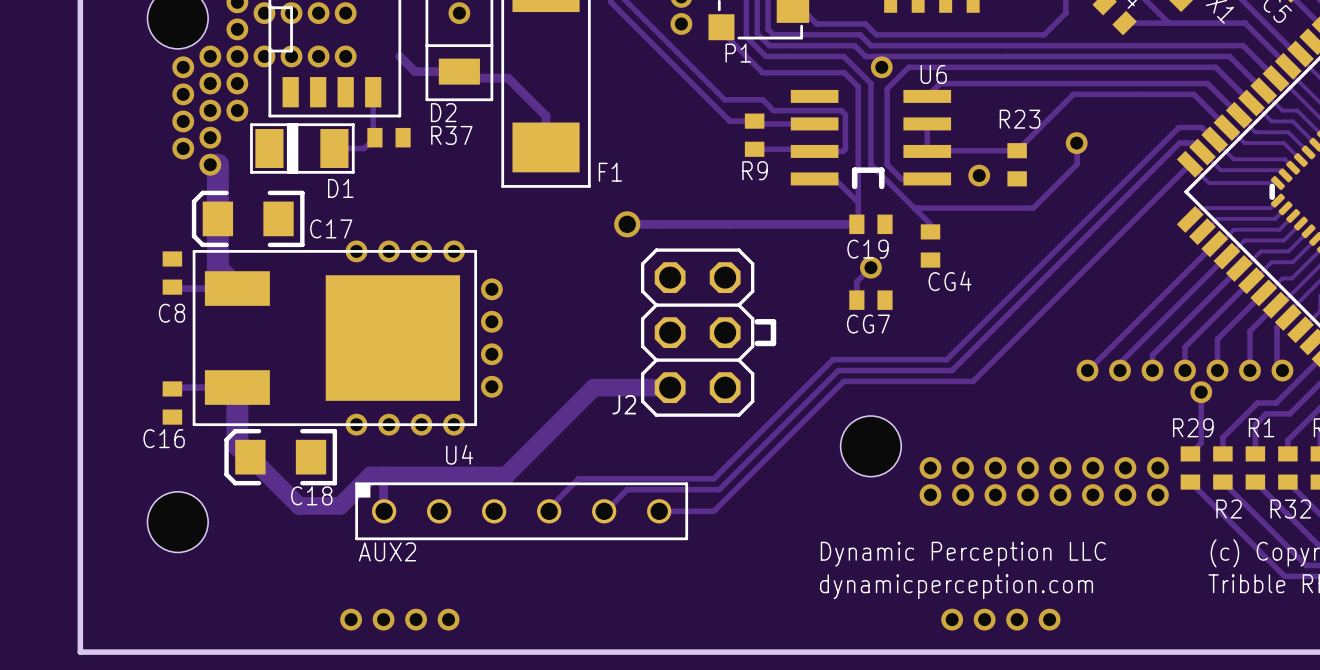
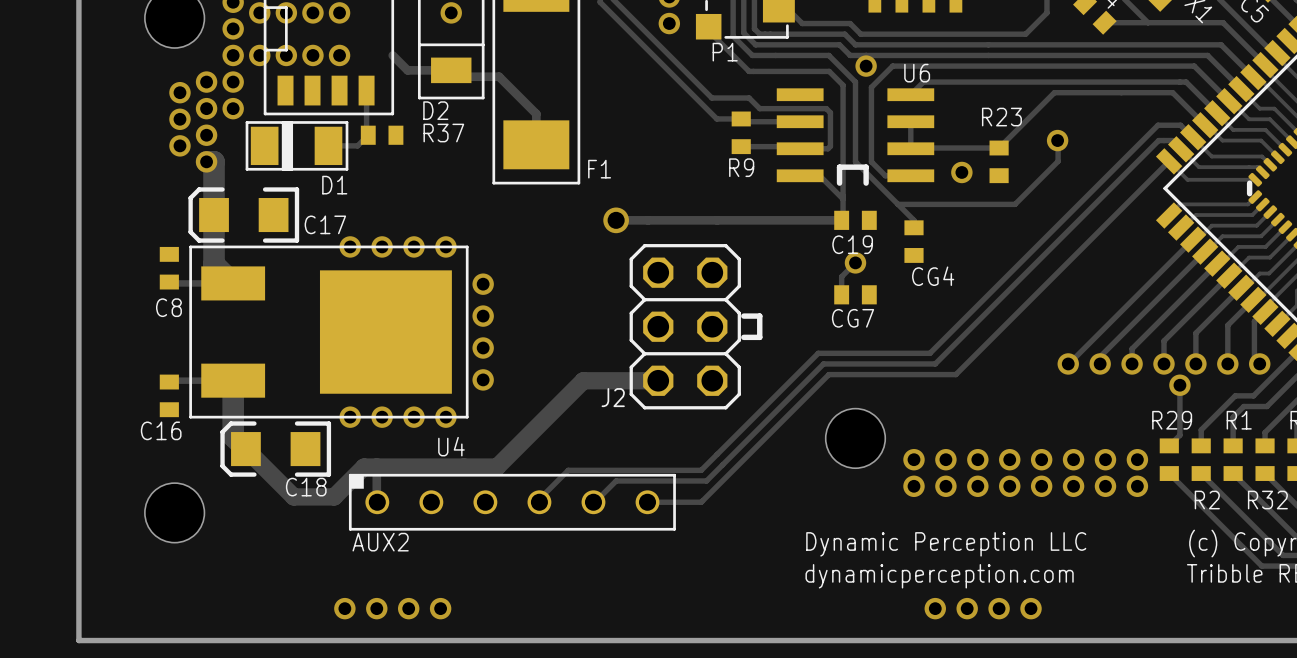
via: (210, 56) -> none
via: (183, 67) -> none

